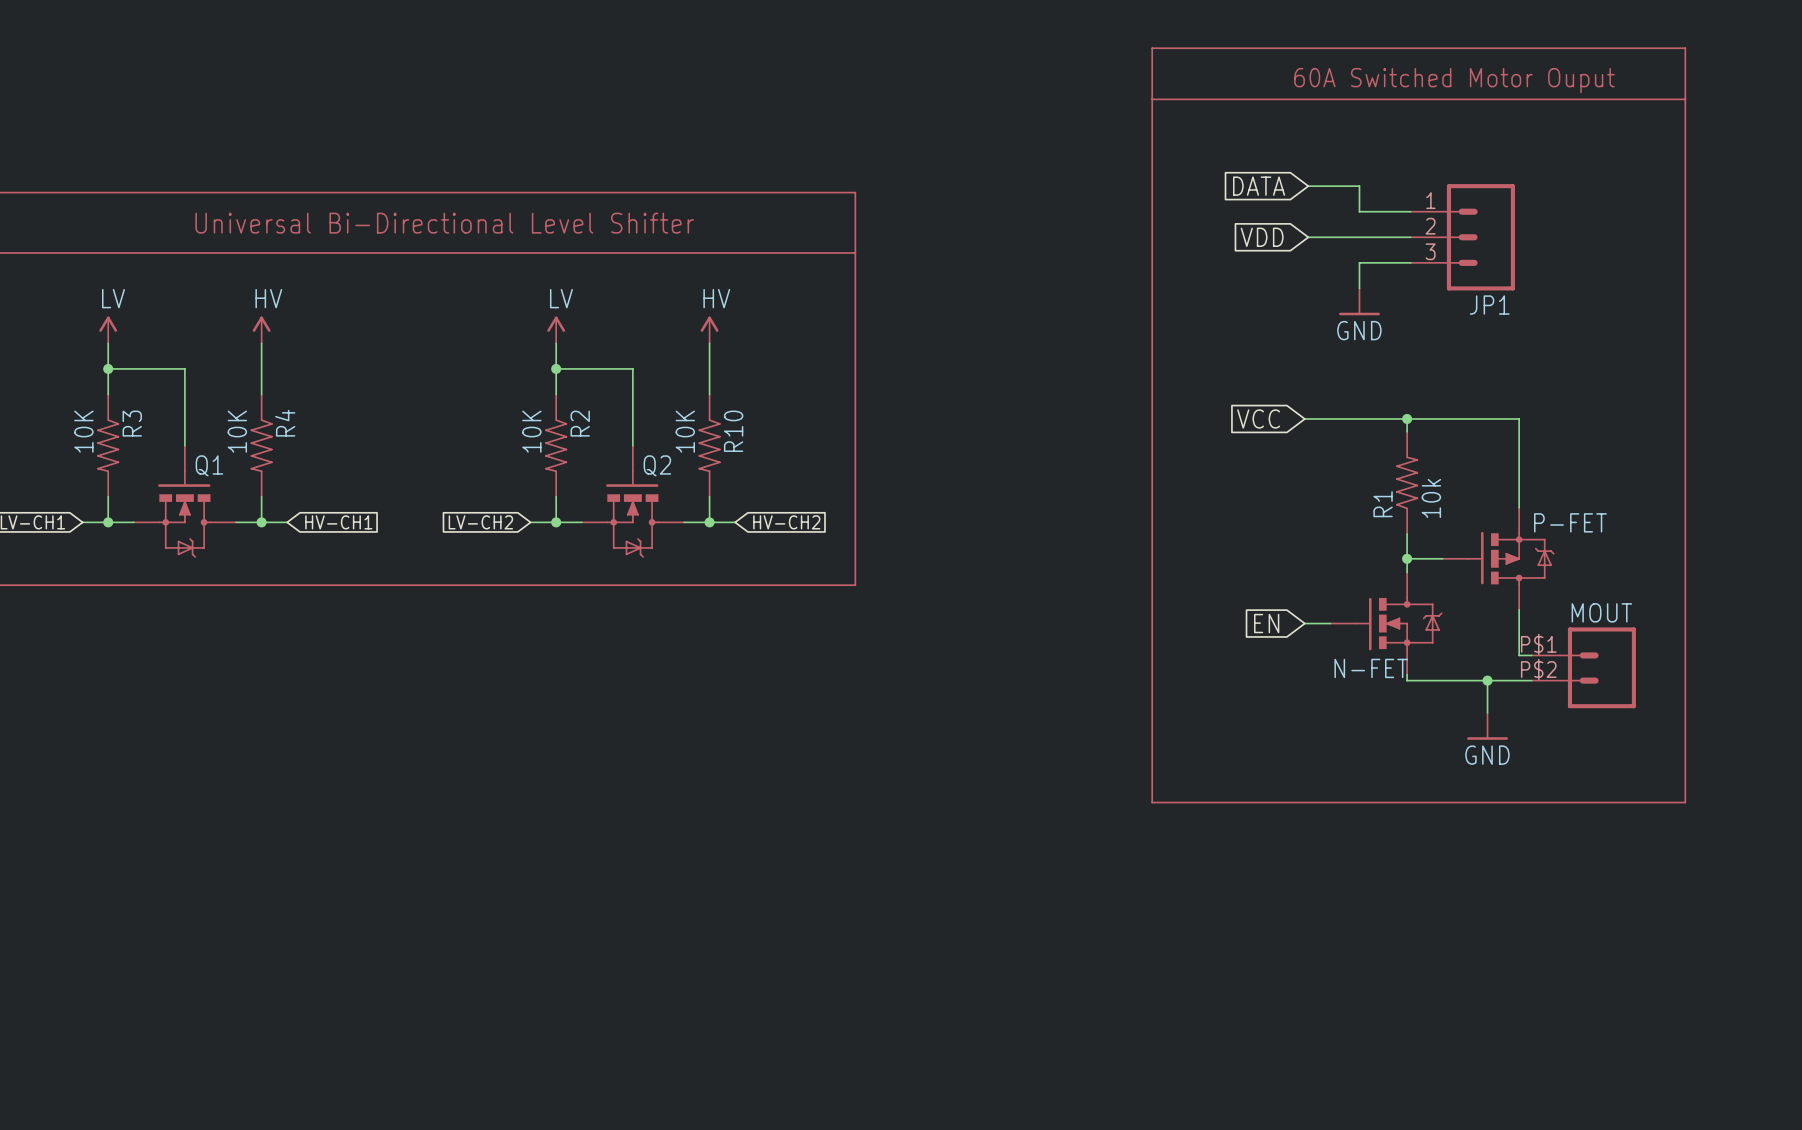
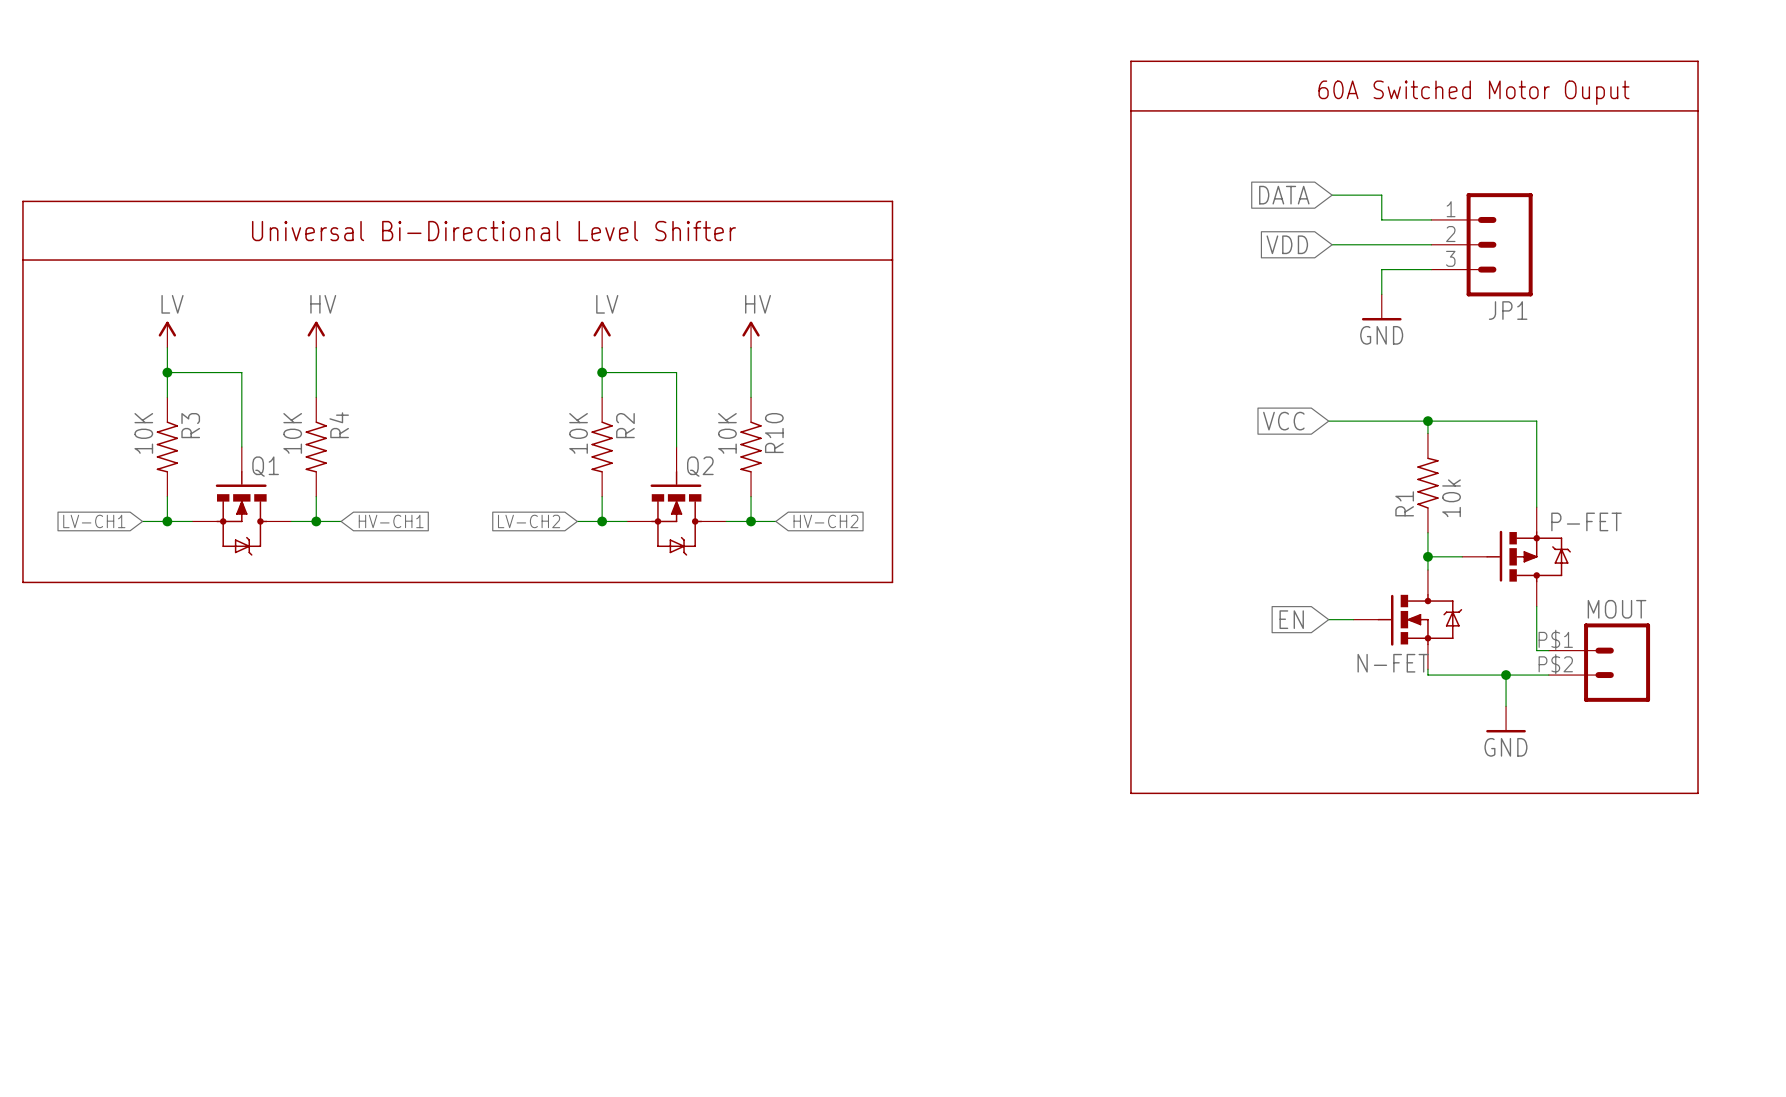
line: (1152, 48) (1152, 802) -> (1180, 61) (1130, 61) (1130, 793) (1180, 793)
line: none -> (1130, 110) (1180, 110)

